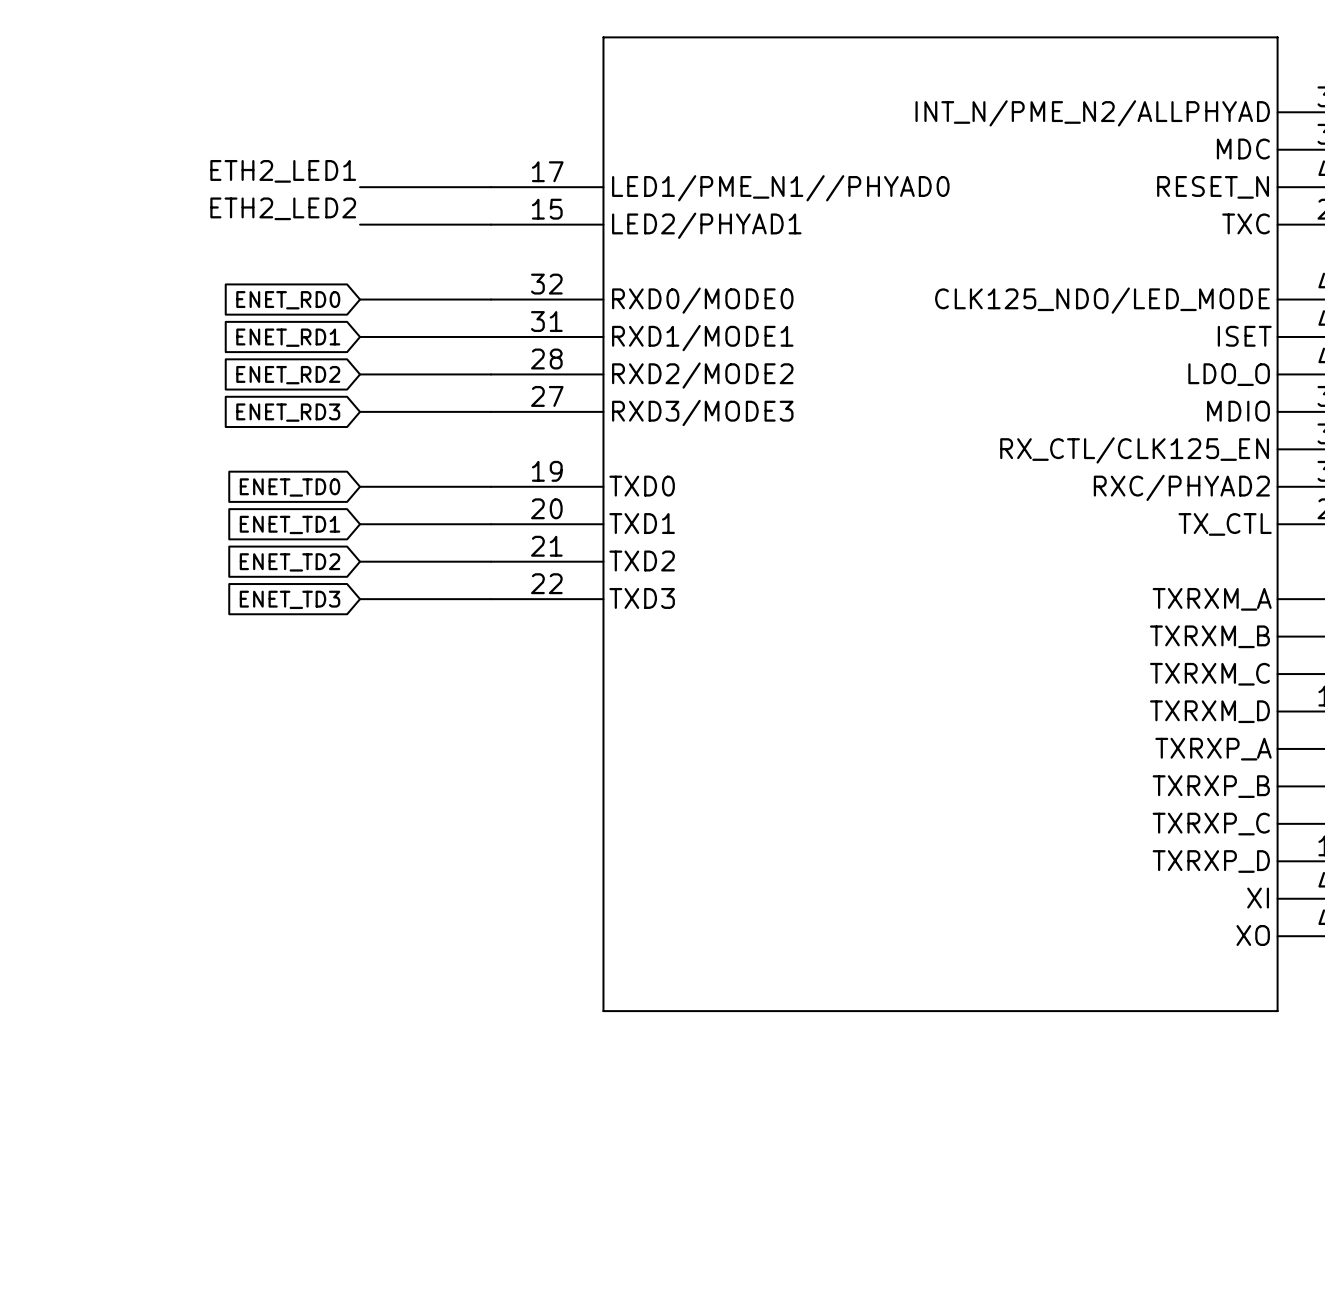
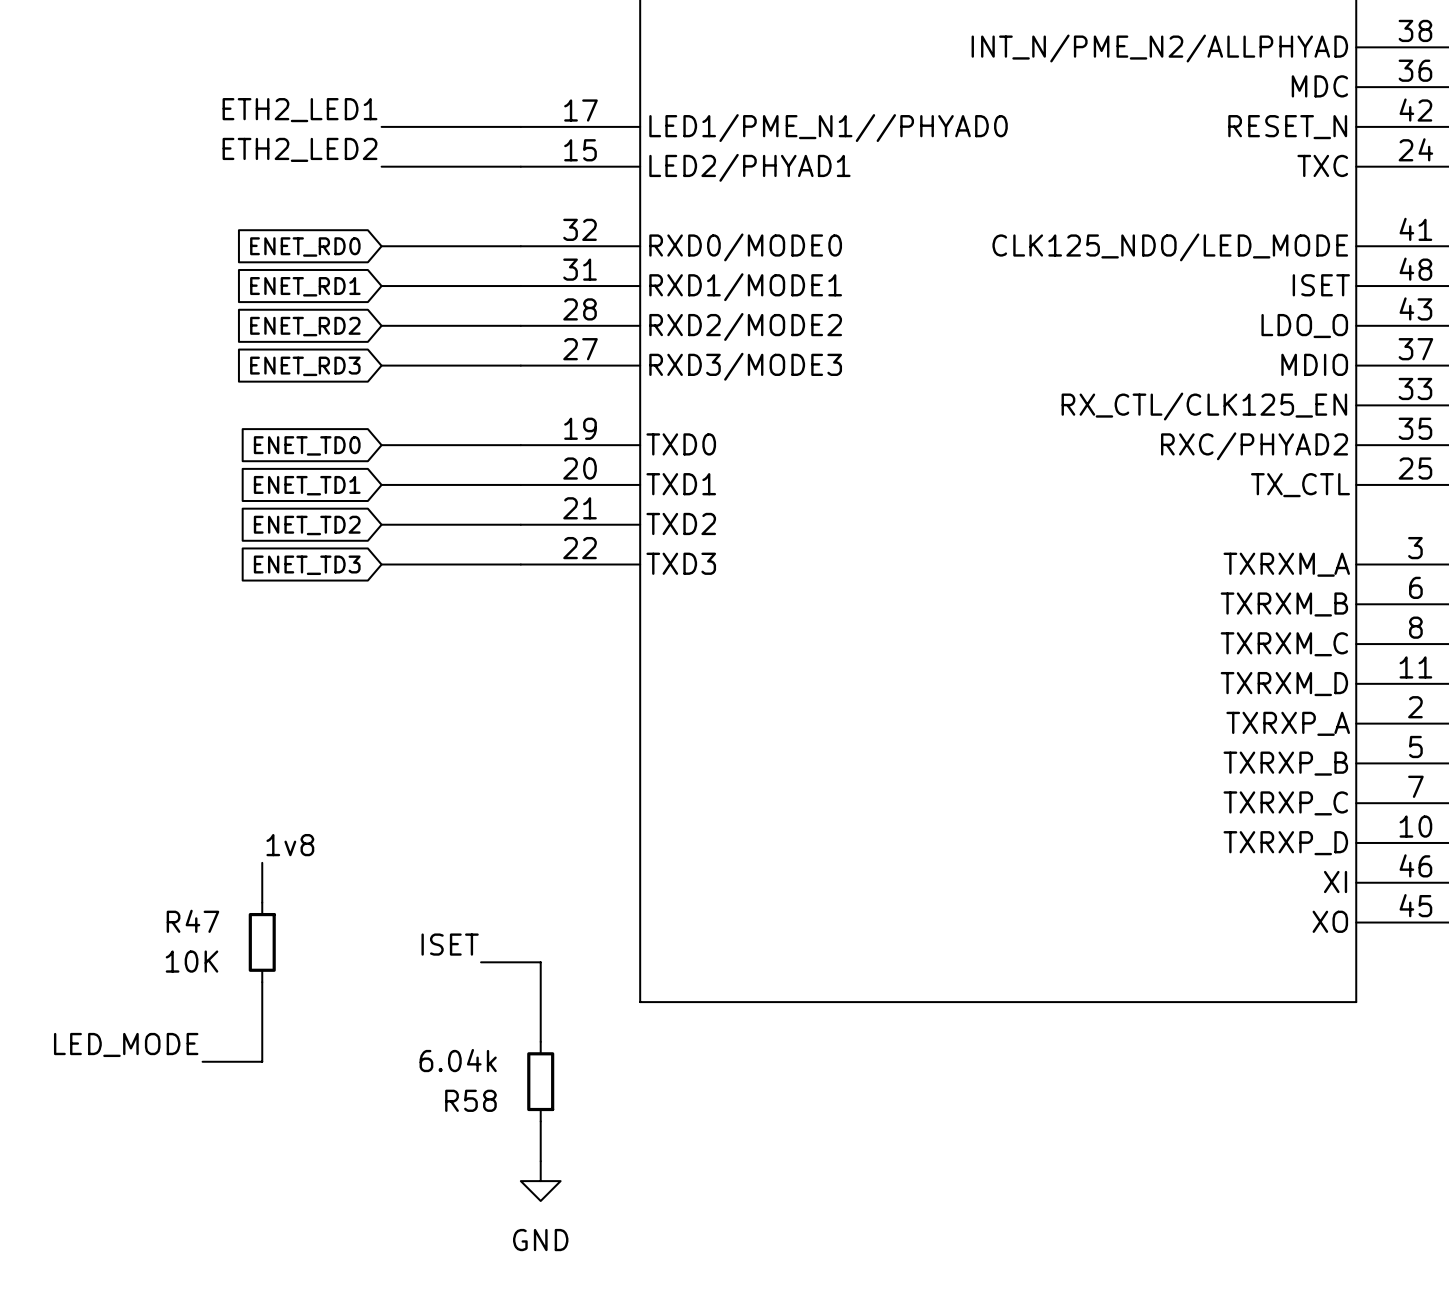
label: none -> 1v8 (290, 845)
wire: none -> (262, 862) (262, 902)
R47: none -> 10K (262, 942)
label: none -> ISET (450, 944)
wire: none -> (481, 962) (540, 962) (540, 1041)
wire: none -> (262, 982) (262, 1061) (202, 1061)
label: none -> LED_MODE (126, 1044)
R58: none -> 6.04k (540, 1081)
wire: none -> (540, 1121) (540, 1161)
power symbol: none -> GND (540, 1181)

